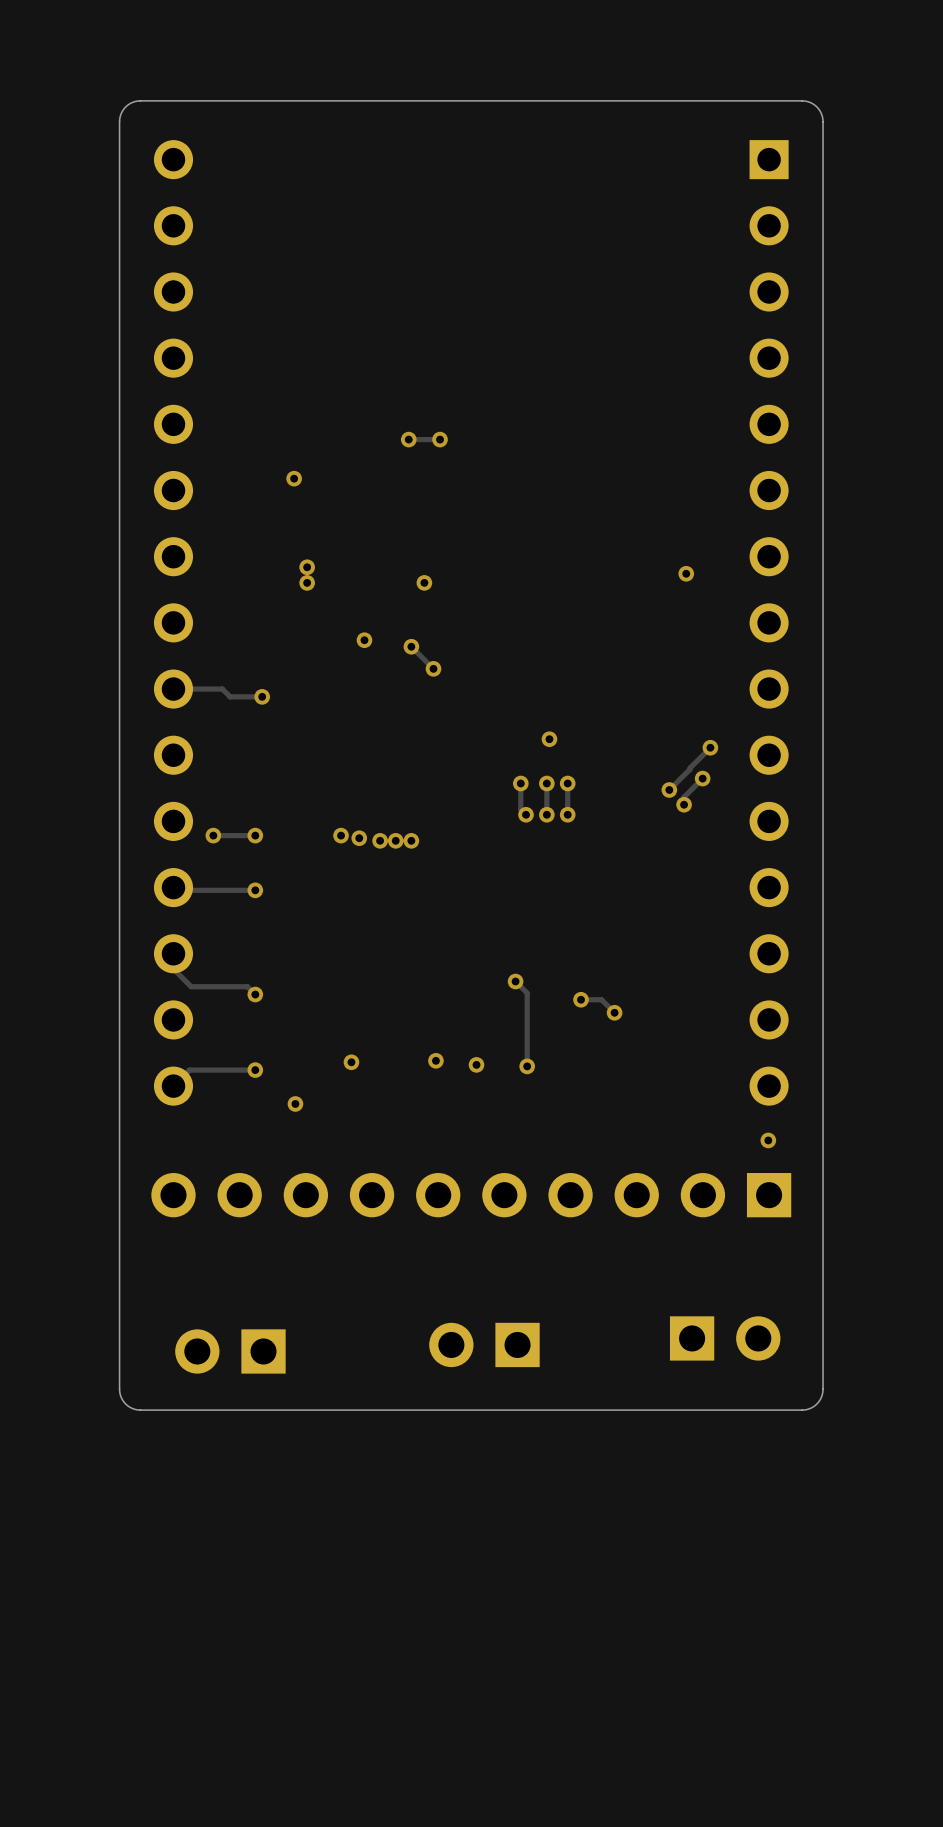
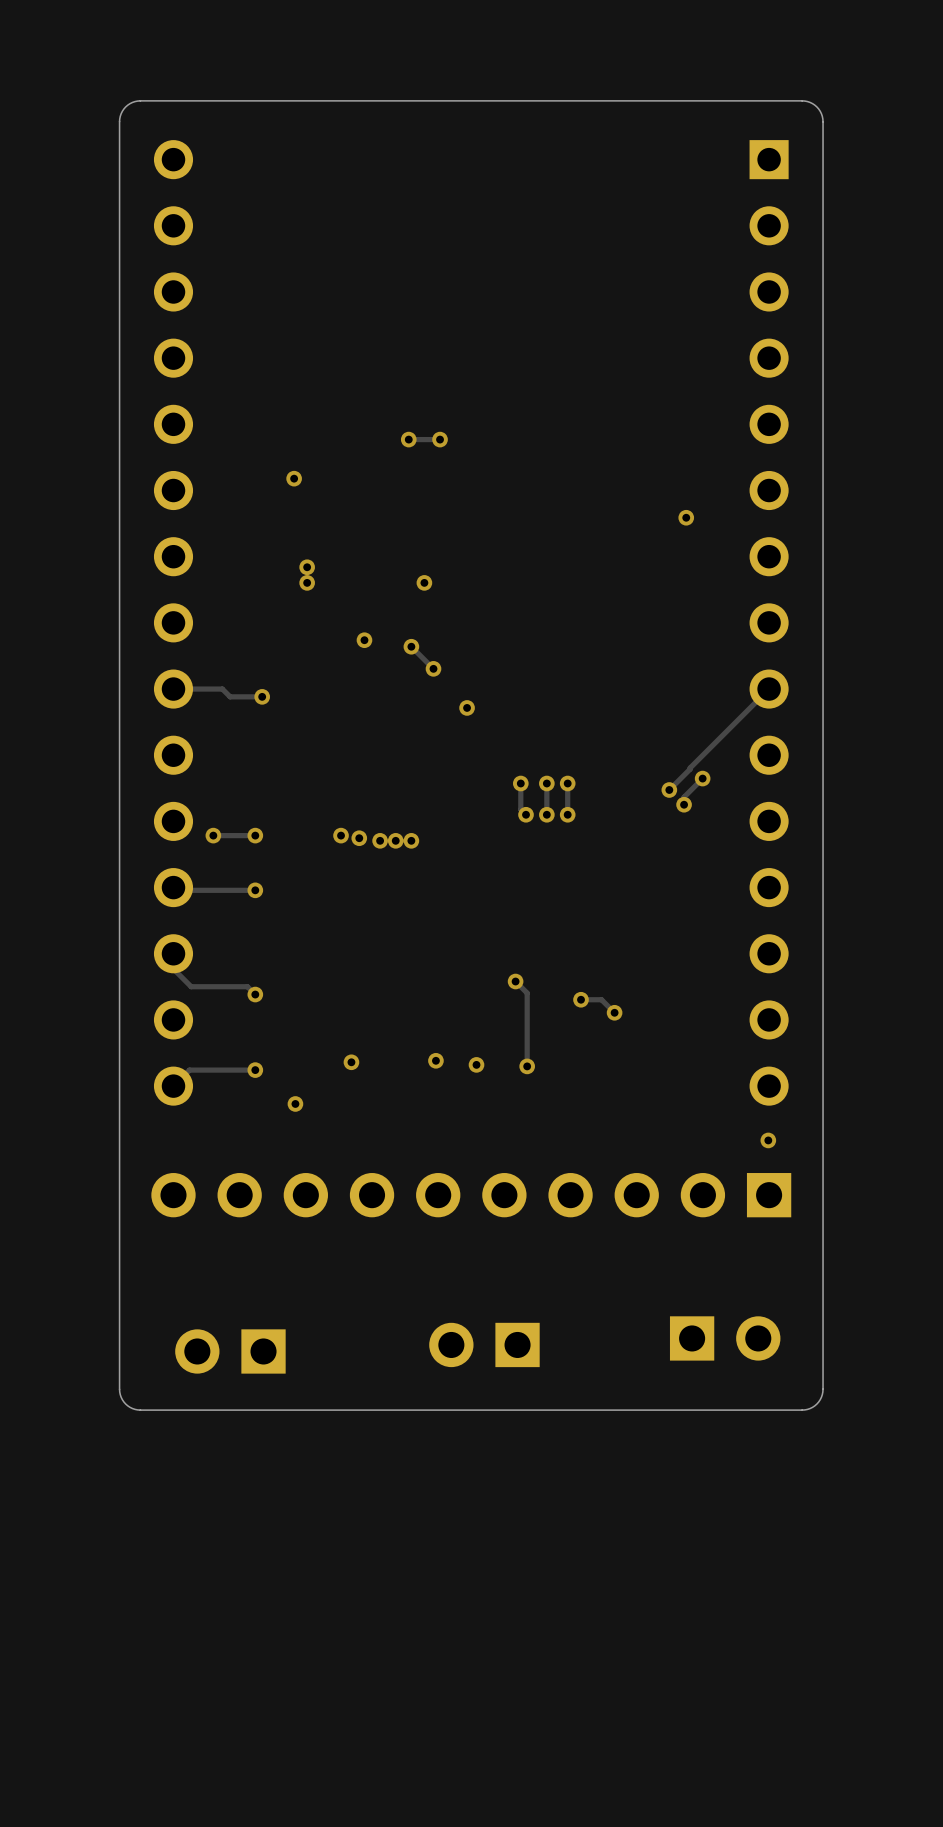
via position: (686, 573) -> (686, 517)
track: none -> (769, 689) (710, 747)
via position: (549, 739) -> (467, 707)
via: (710, 747) -> none

